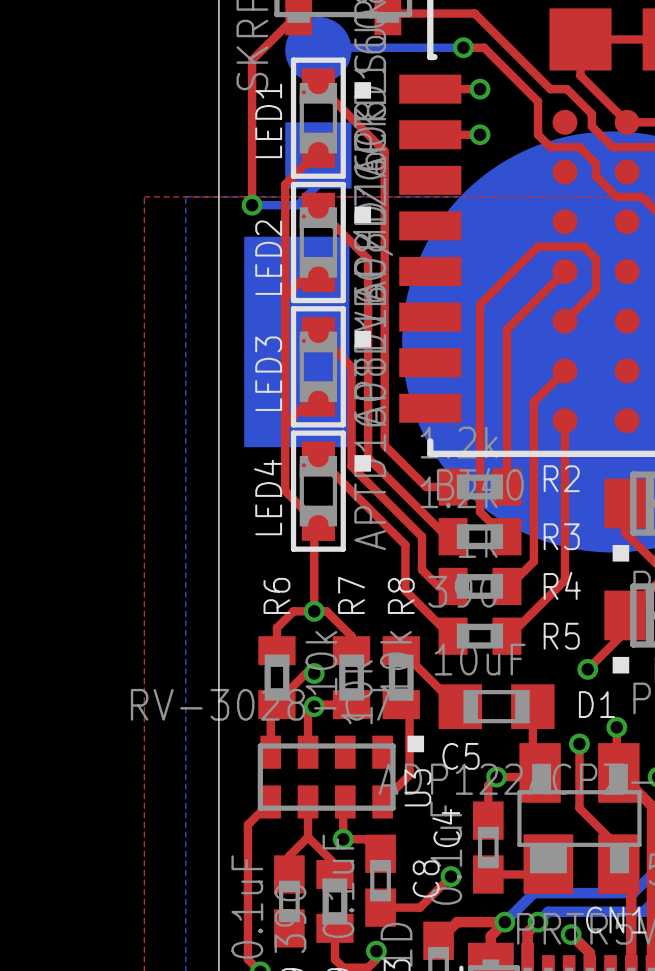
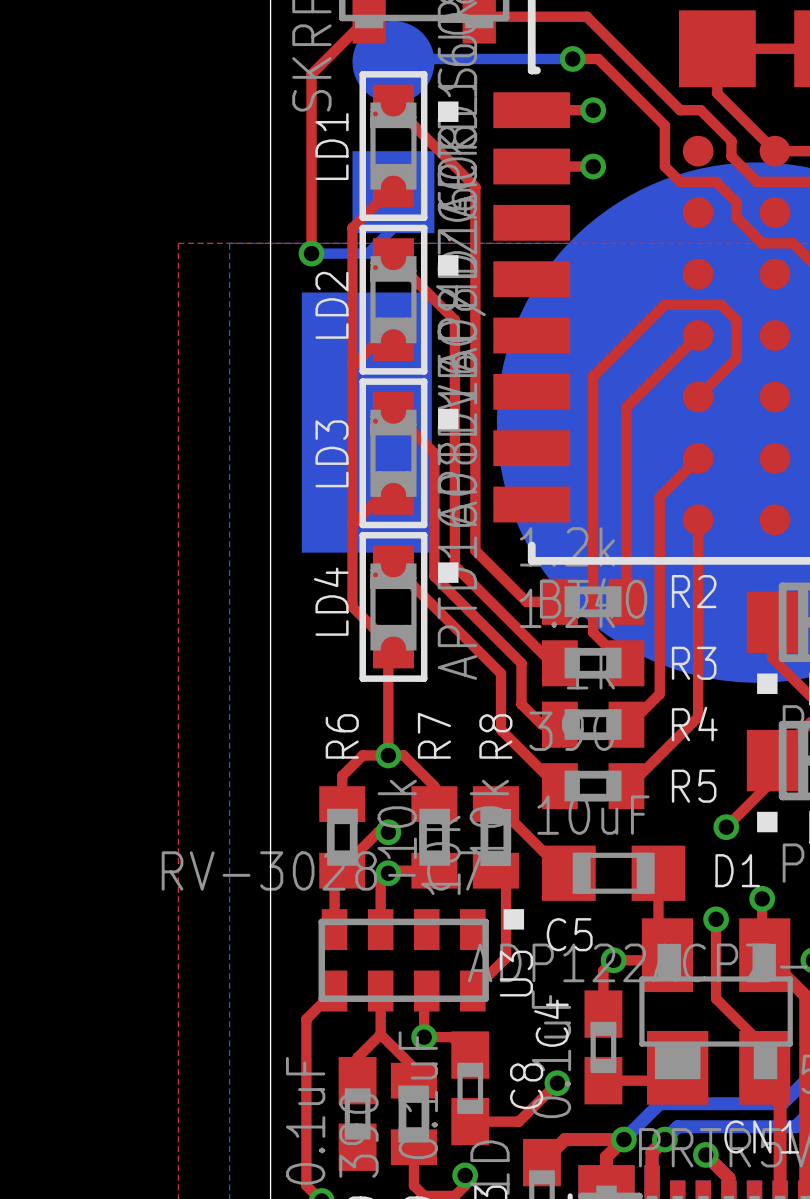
LED1 name: LED1 (268, 120) -> LD1 (332, 146)
LED2 name: LED2 (268, 257) -> LD2 (332, 305)
LED3 name: LED3 (268, 373) -> LD3 (332, 453)
LED4 name: LED4 (268, 497) -> LD4 (331, 601)

